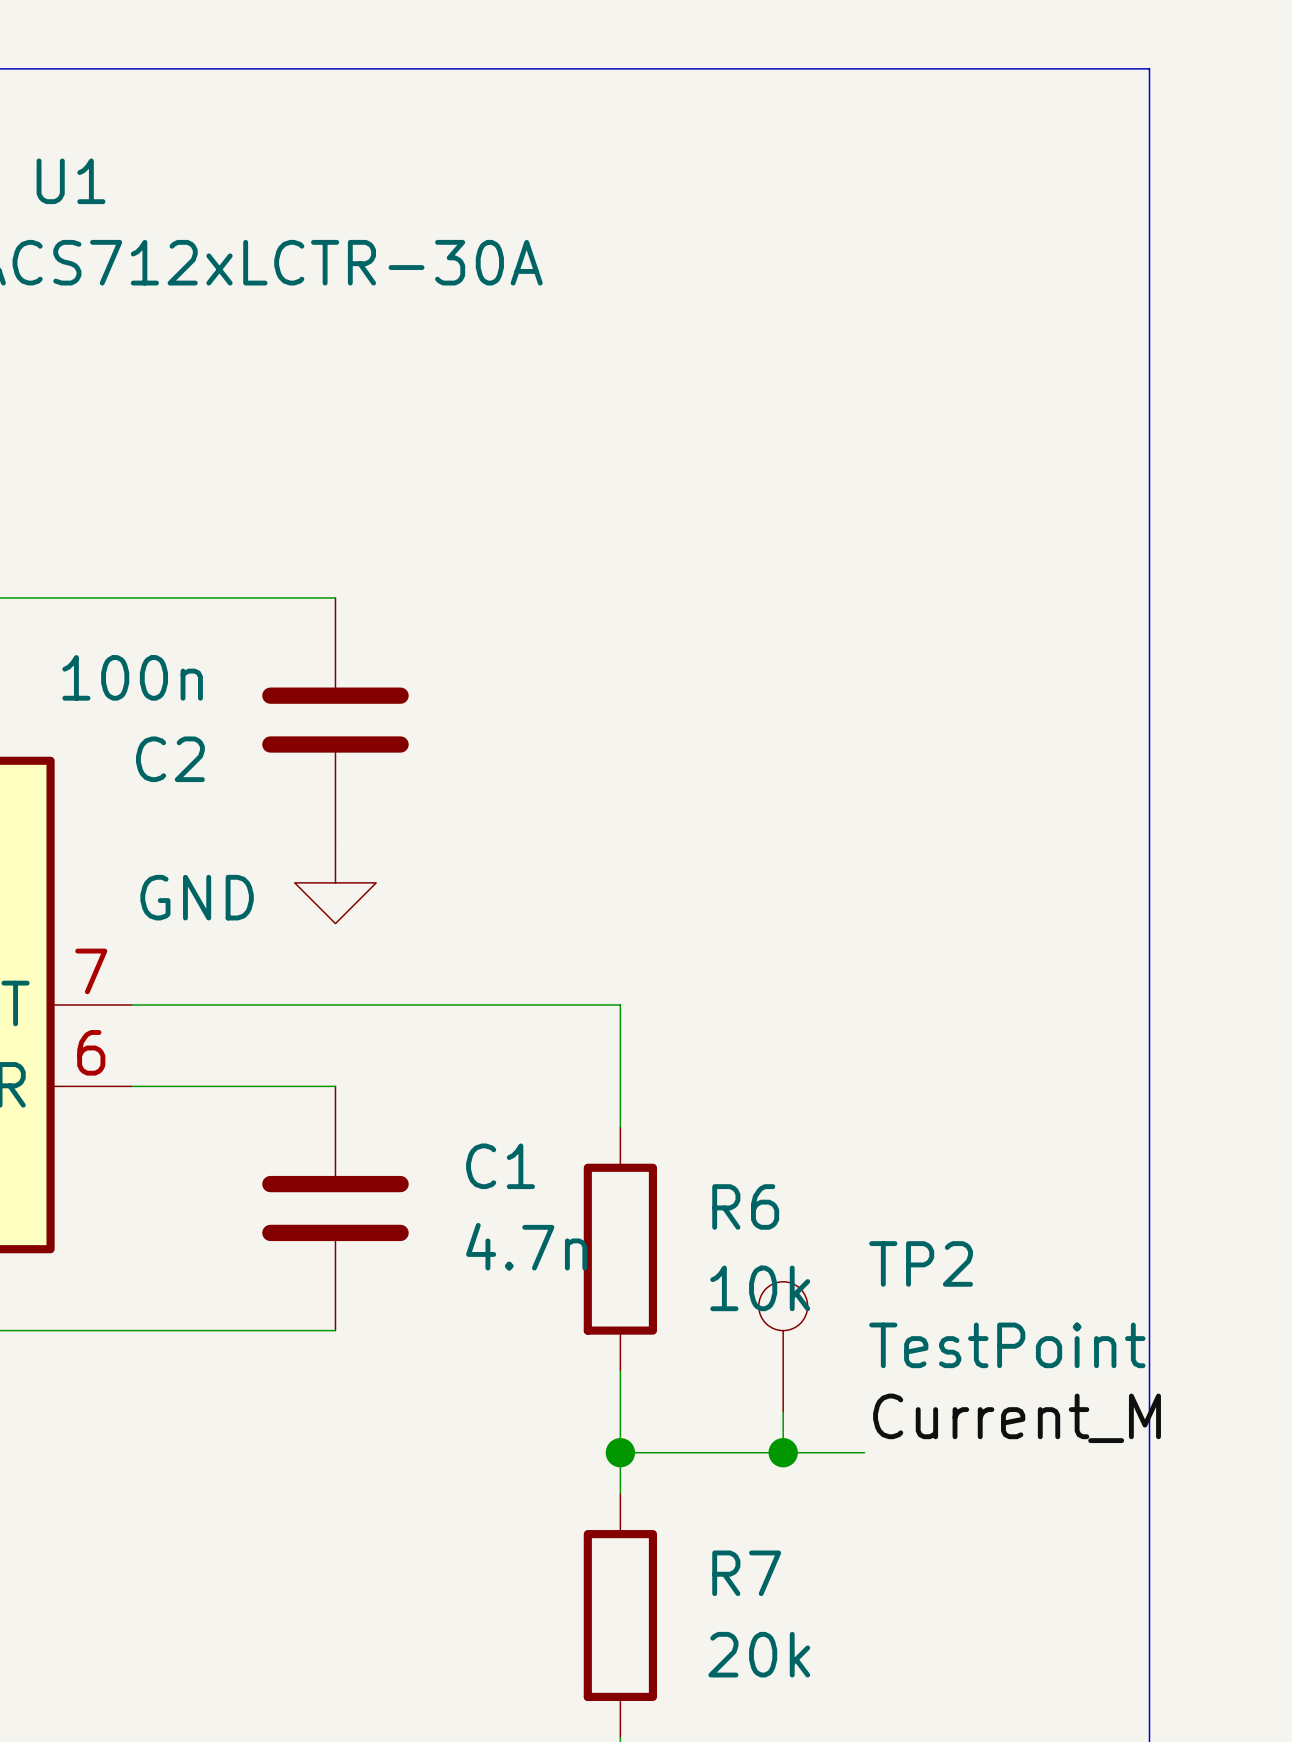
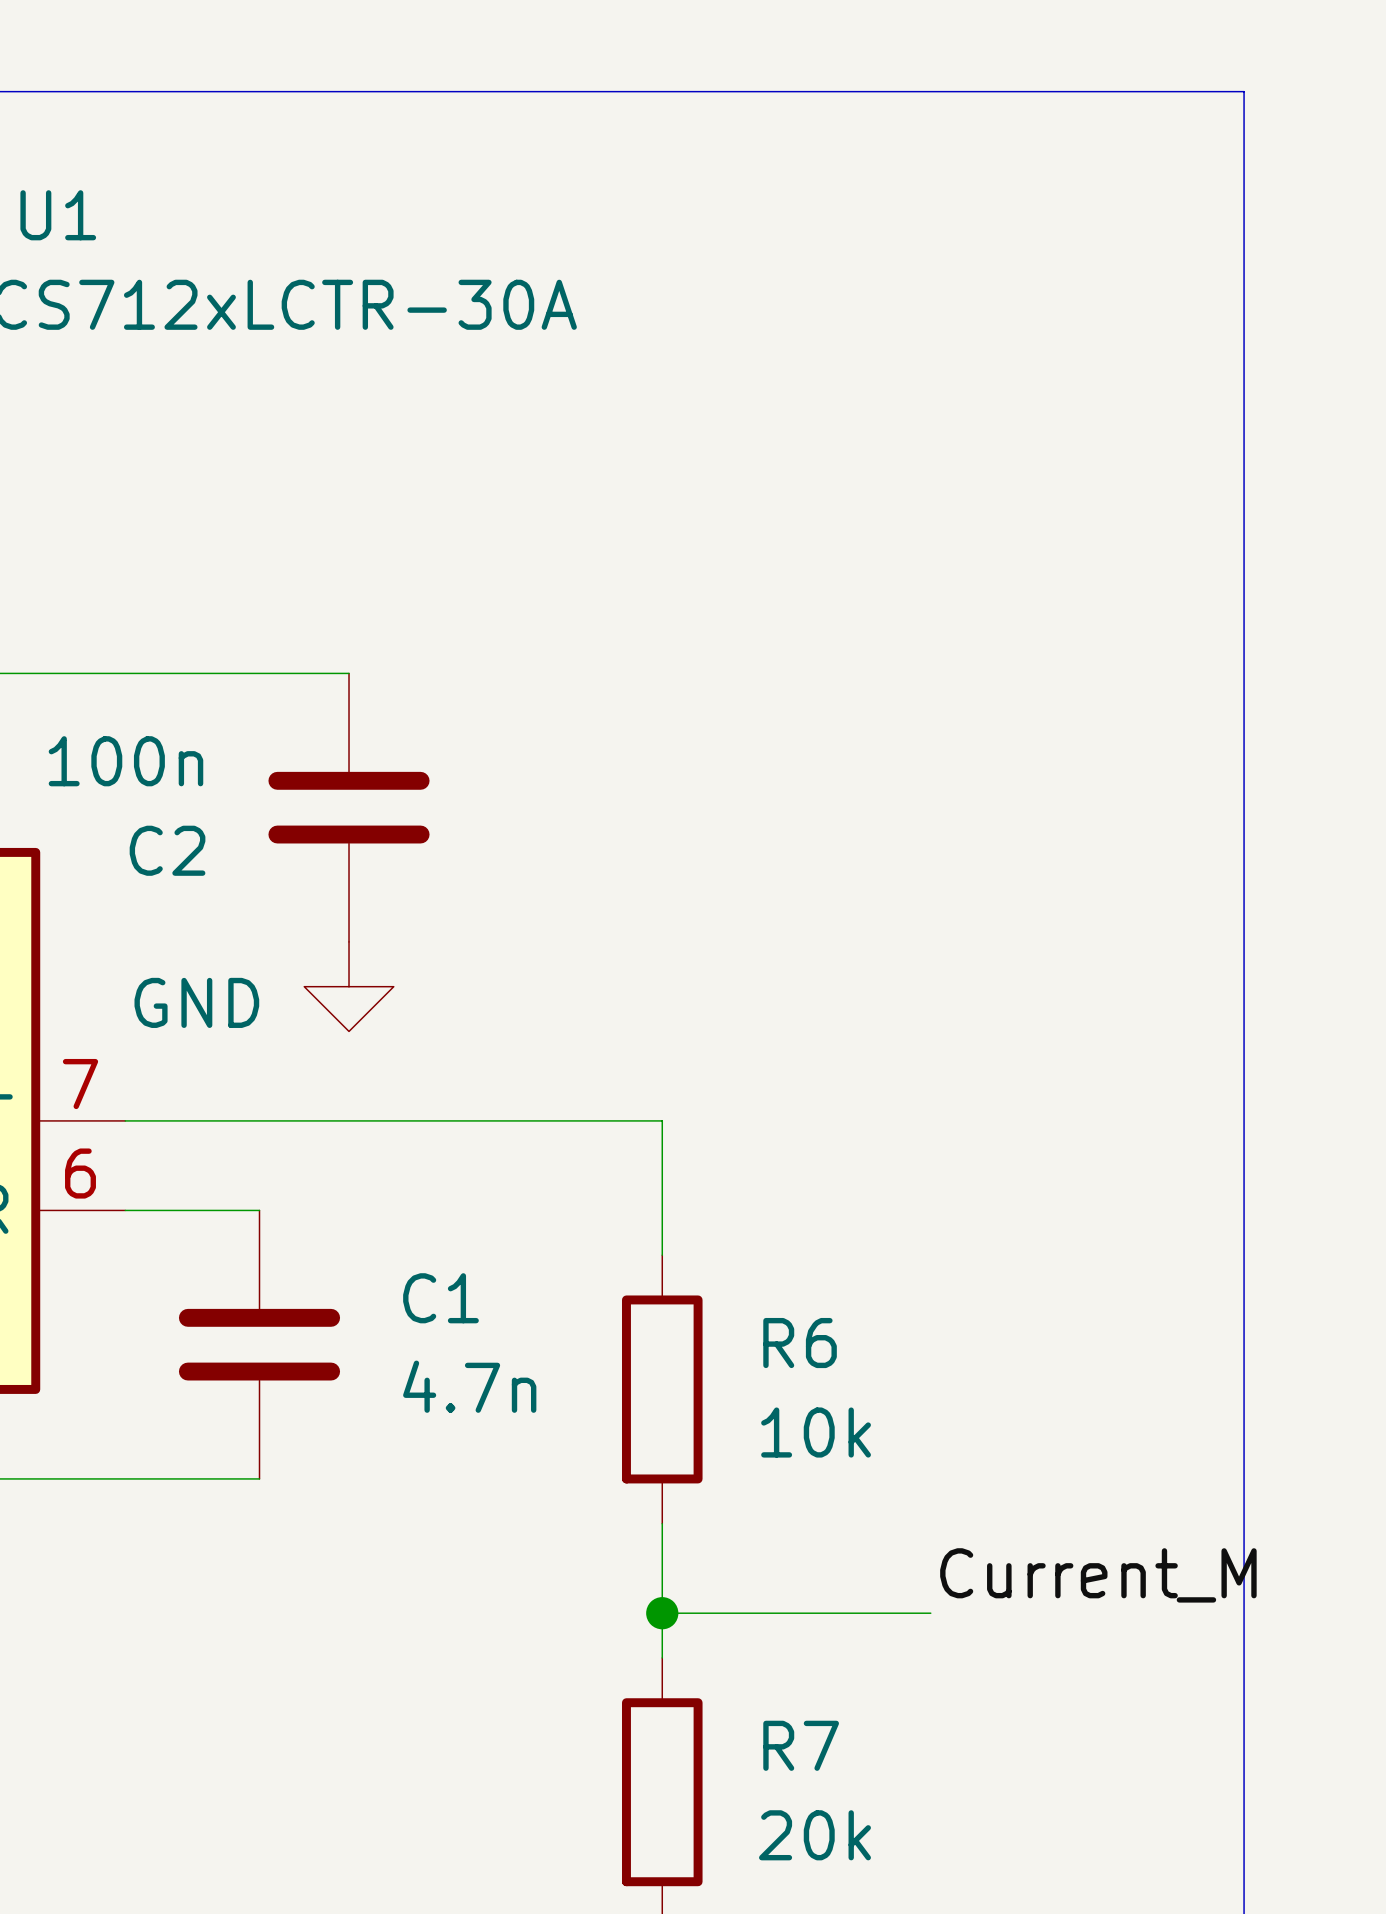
wire: (254, 1086) (335, 1086) -> none
C1 position: (335, 1208) -> (259, 1344)
wire: (254, 1330) (335, 1330) -> none
TP2: TestPoint (783, 1346) -> none
wire: (783, 1412) (783, 1452) -> none
junction: (783, 1452) -> none

